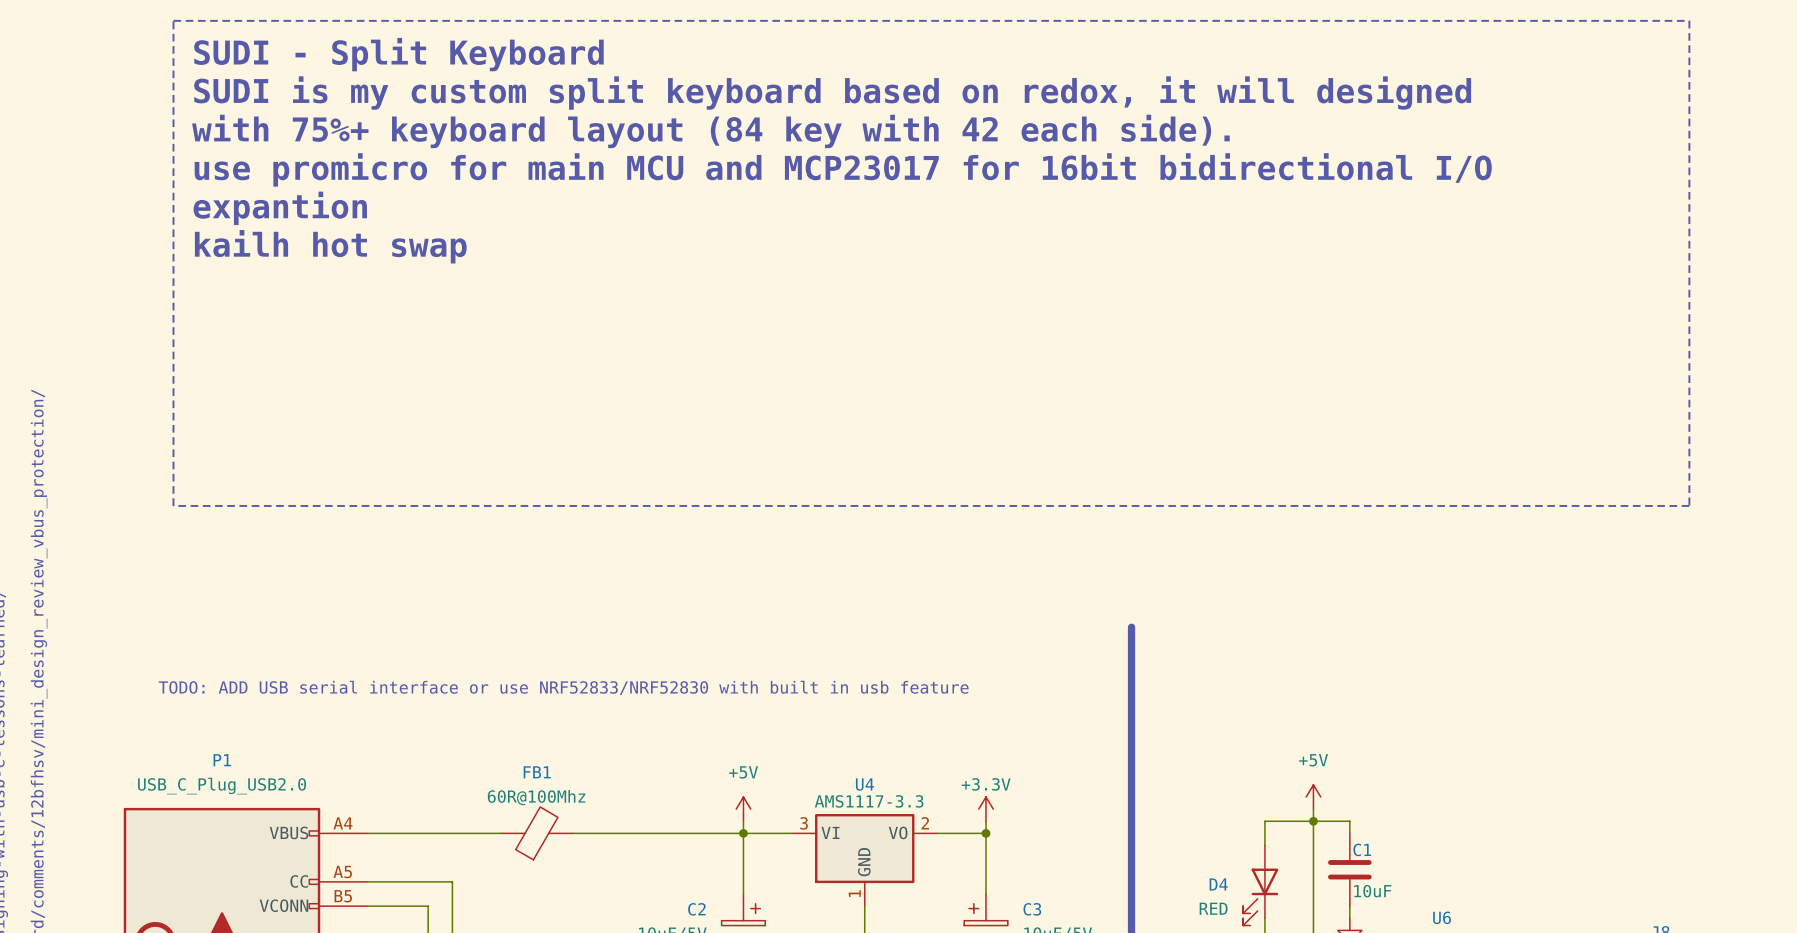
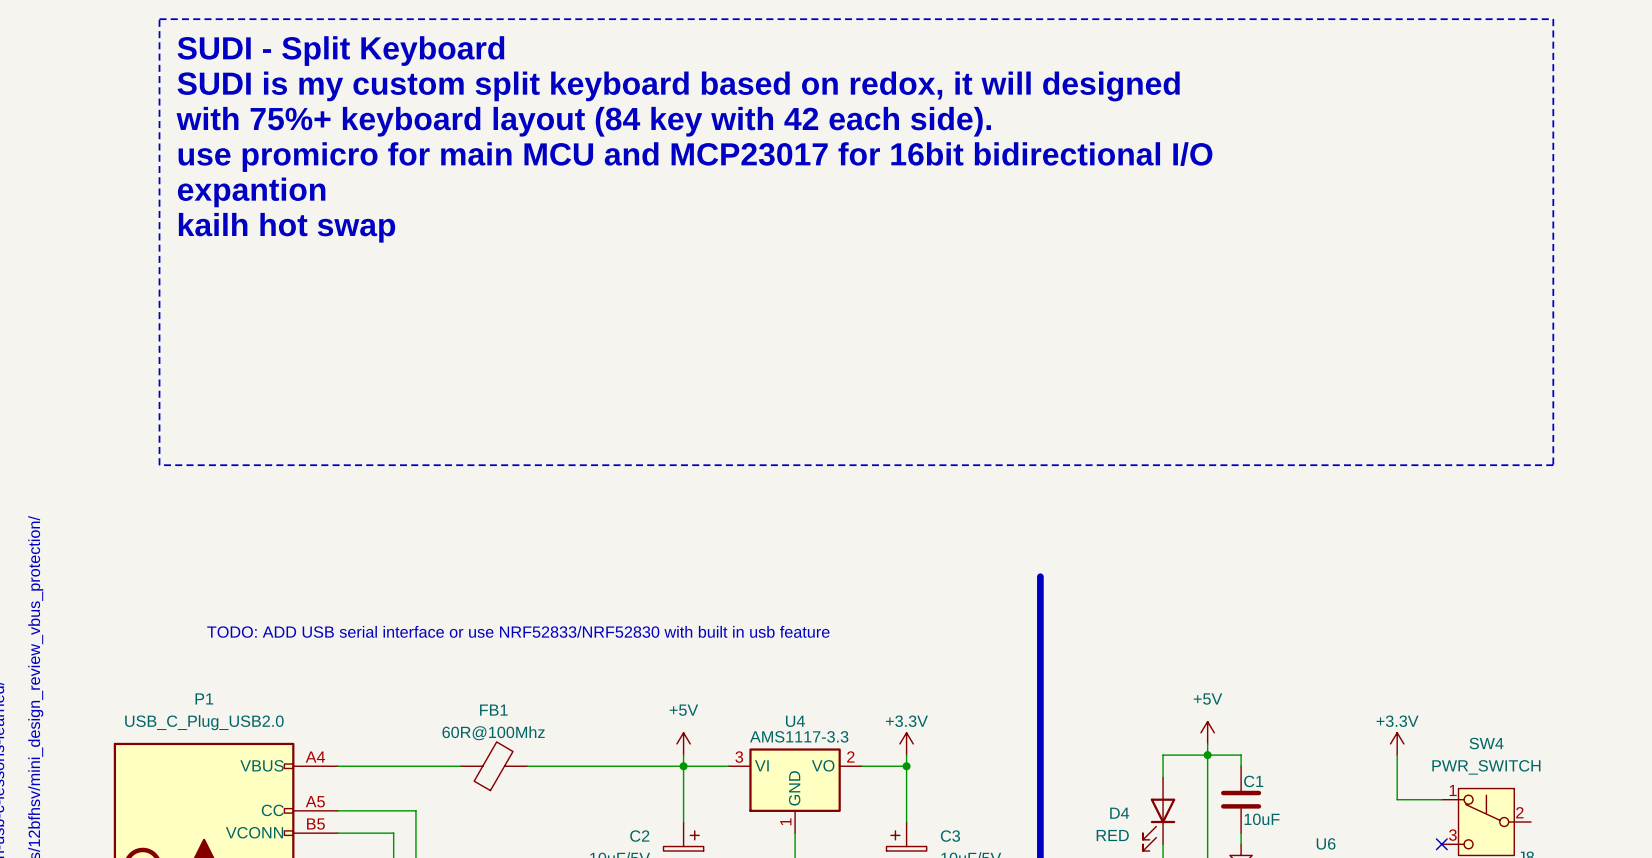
power symbol: none -> +3.3V (1397, 743)
wire: none -> (1397, 755) (1397, 799) (1441, 799)
SW4: none -> PWR_SWITCH (1486, 822)
no-connect mark: none -> (1441, 844)

